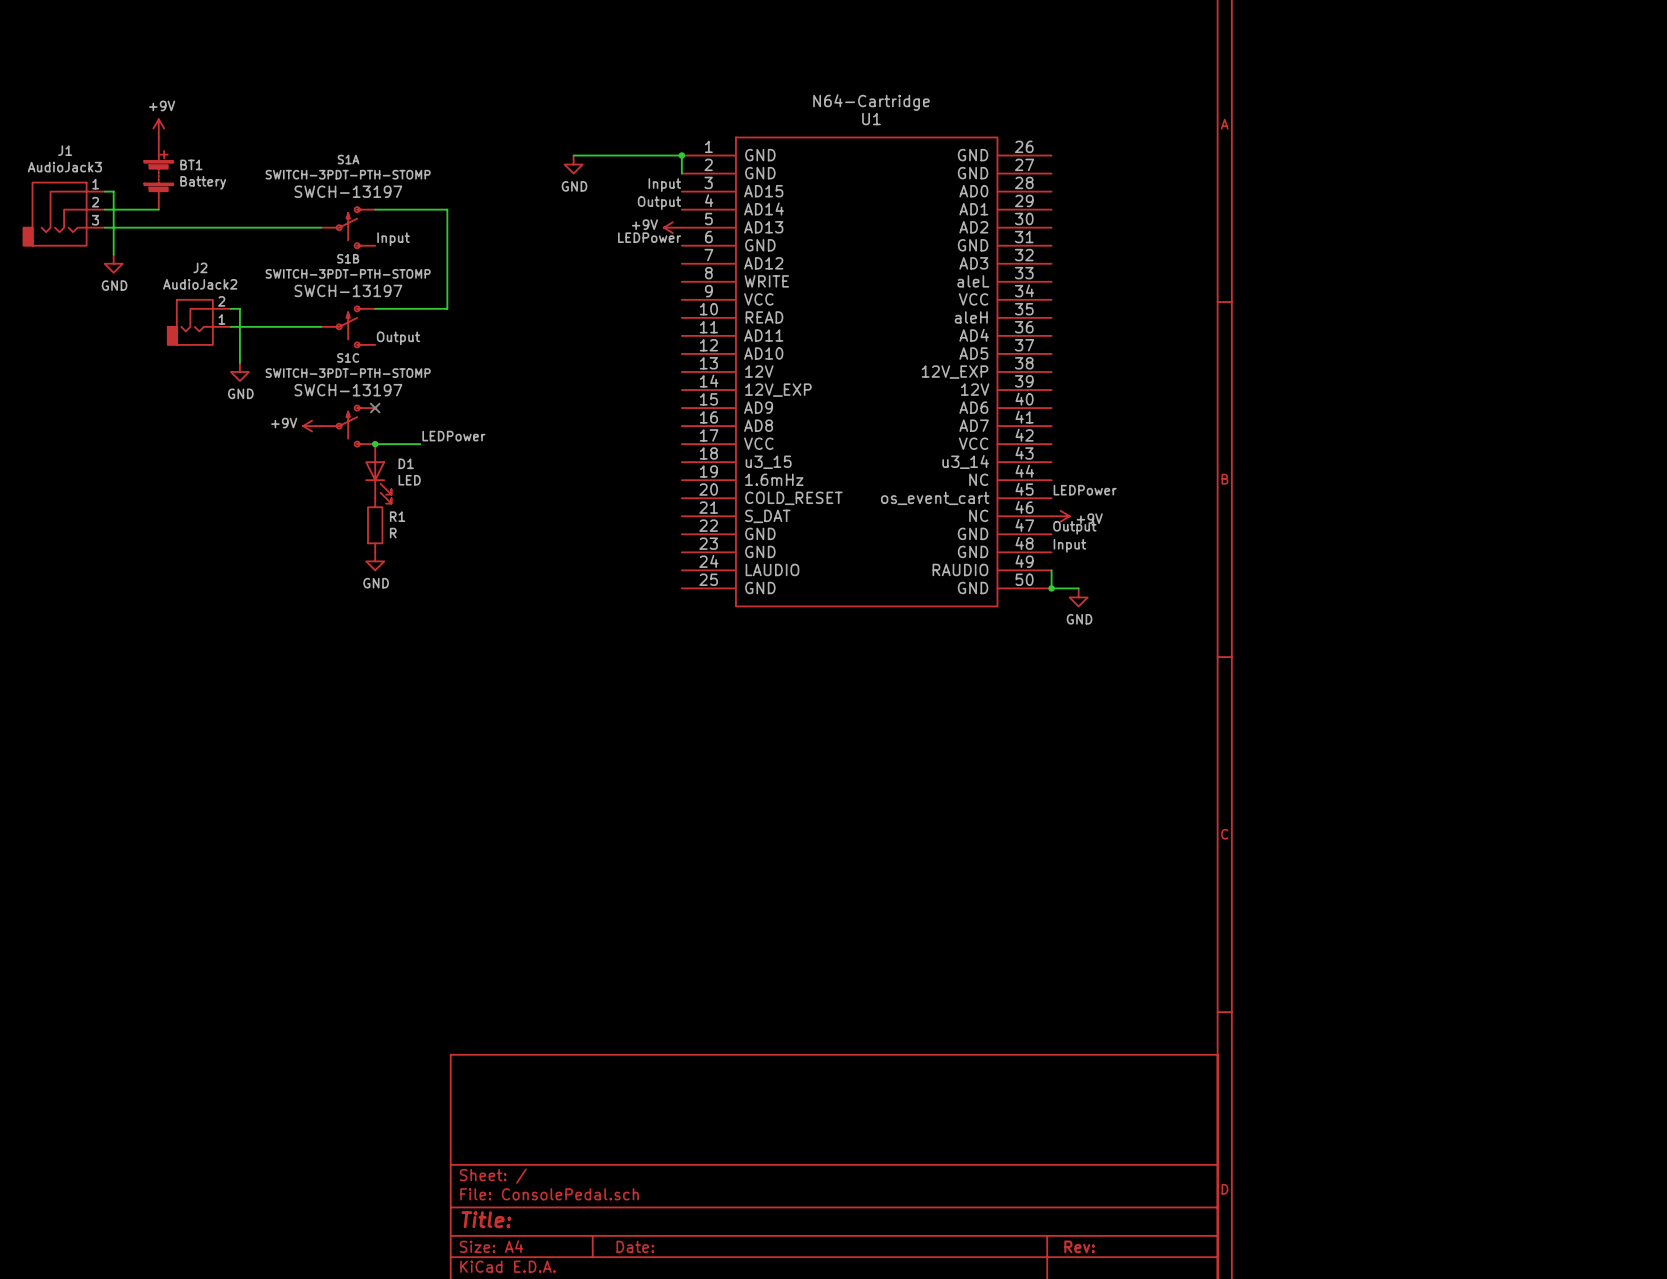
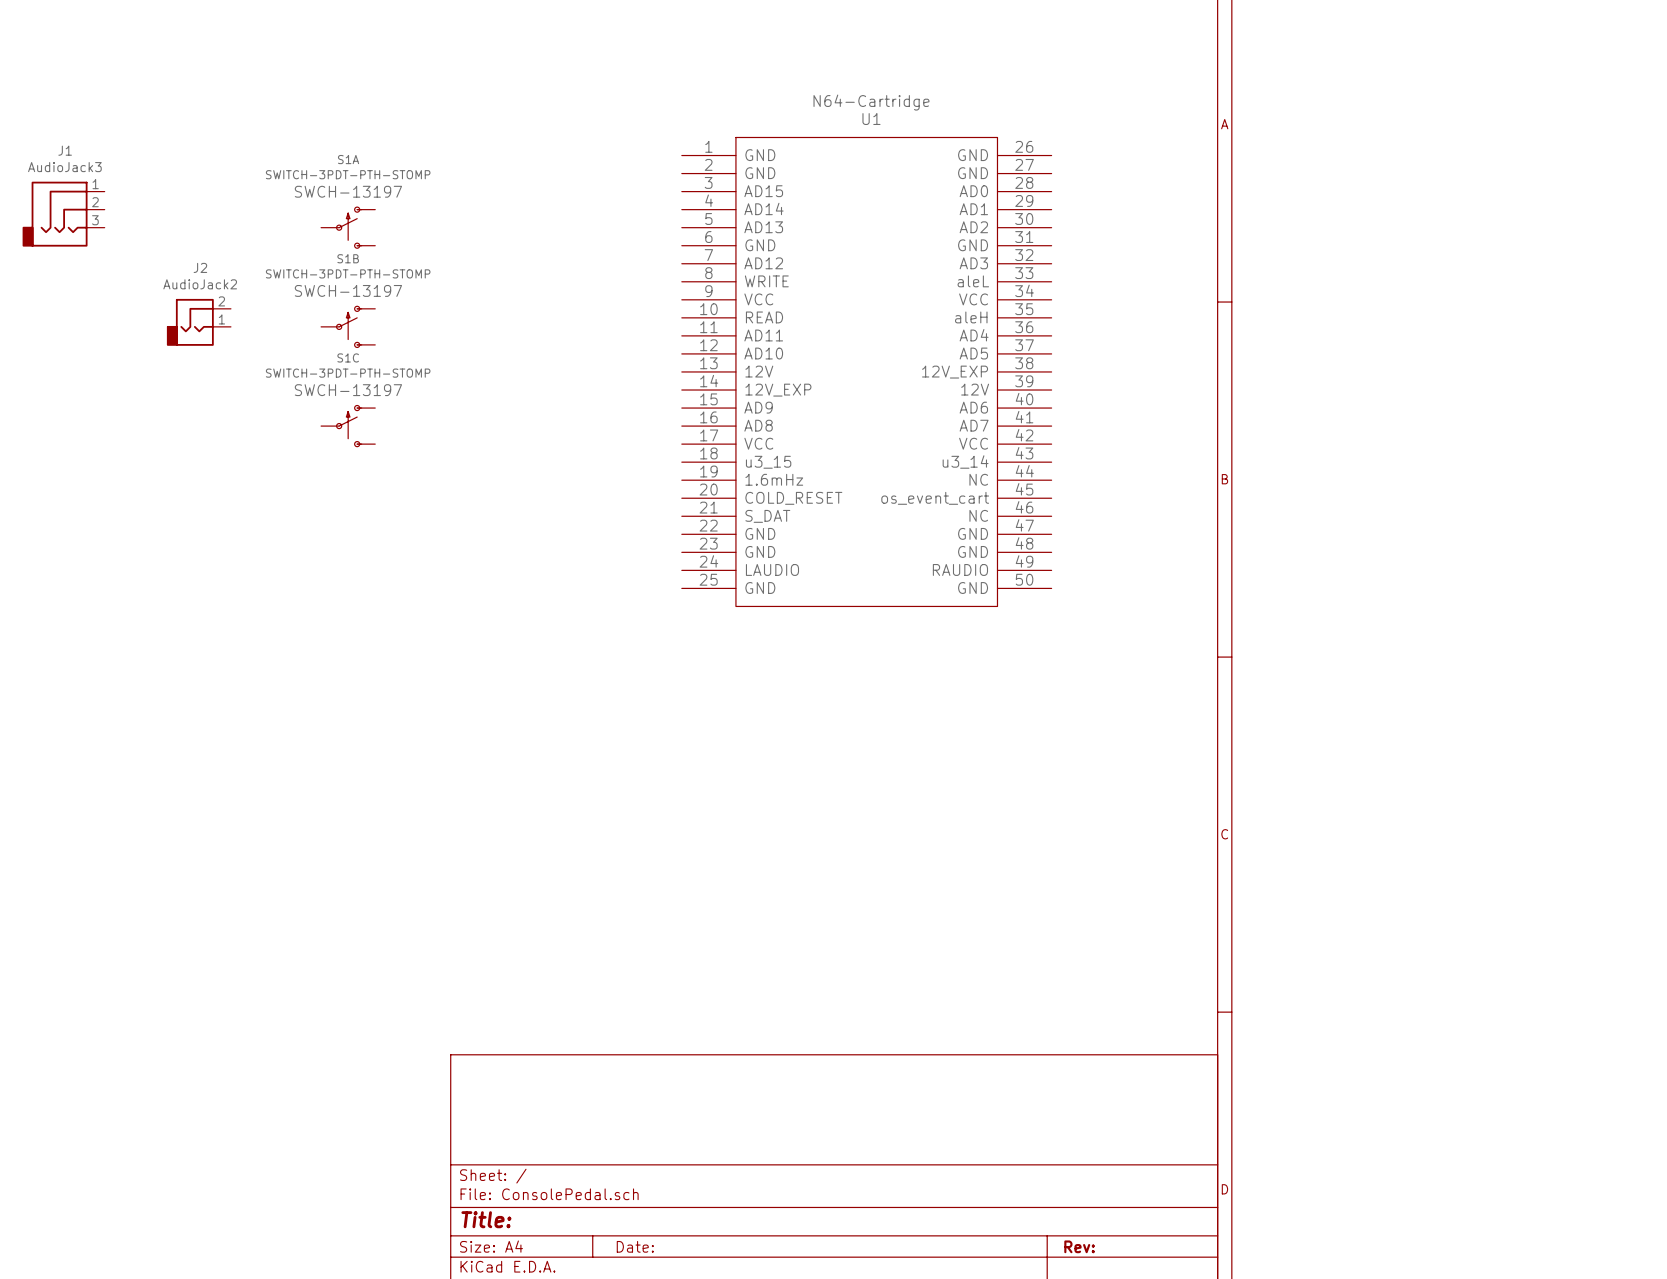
power symbol: +9V (158, 128) -> none
wire: (573, 155) (681, 155) (681, 173) -> none
junction: (681, 155) -> none
power symbol: GND (573, 164) -> none
BT1: Battery (158, 173) -> none
label: Input (664, 185) -> none
wire: (104, 191) (113, 191) (113, 254) -> none
label: Output (659, 203) -> none
wire: (104, 209) (158, 209) -> none
wire: (375, 209) (447, 209) (447, 308) (375, 308) -> none
wire: (104, 227) (321, 227) -> none
power symbol: +9V (672, 227) -> none
label: LEDPower (649, 237) -> none
label: Input (393, 239) -> none
power symbol: GND (113, 263) -> none
wire: (230, 308) (239, 308) (239, 362) -> none
wire: (230, 326) (321, 326) -> none
label: Output (398, 338) -> none
power symbol: GND (239, 371) -> none
no-connect mark: (375, 408) -> none
power symbol: +9V (312, 426) -> none
label: LEDPower (453, 436) -> none
wire: (375, 444) (420, 444) -> none
junction: (375, 444) -> none
D1: LED (378, 473) -> none
label: LEDPower (1085, 490) -> none
power symbol: +9V (1060, 516) -> none
R1: R (375, 525) -> none
label: Output (1074, 527) -> none
label: Input (1069, 545) -> none
power symbol: GND (375, 561) -> none
wire: (1051, 570) (1051, 588) (1078, 588) -> none
junction: (1051, 588) -> none
power symbol: GND (1078, 597) -> none

